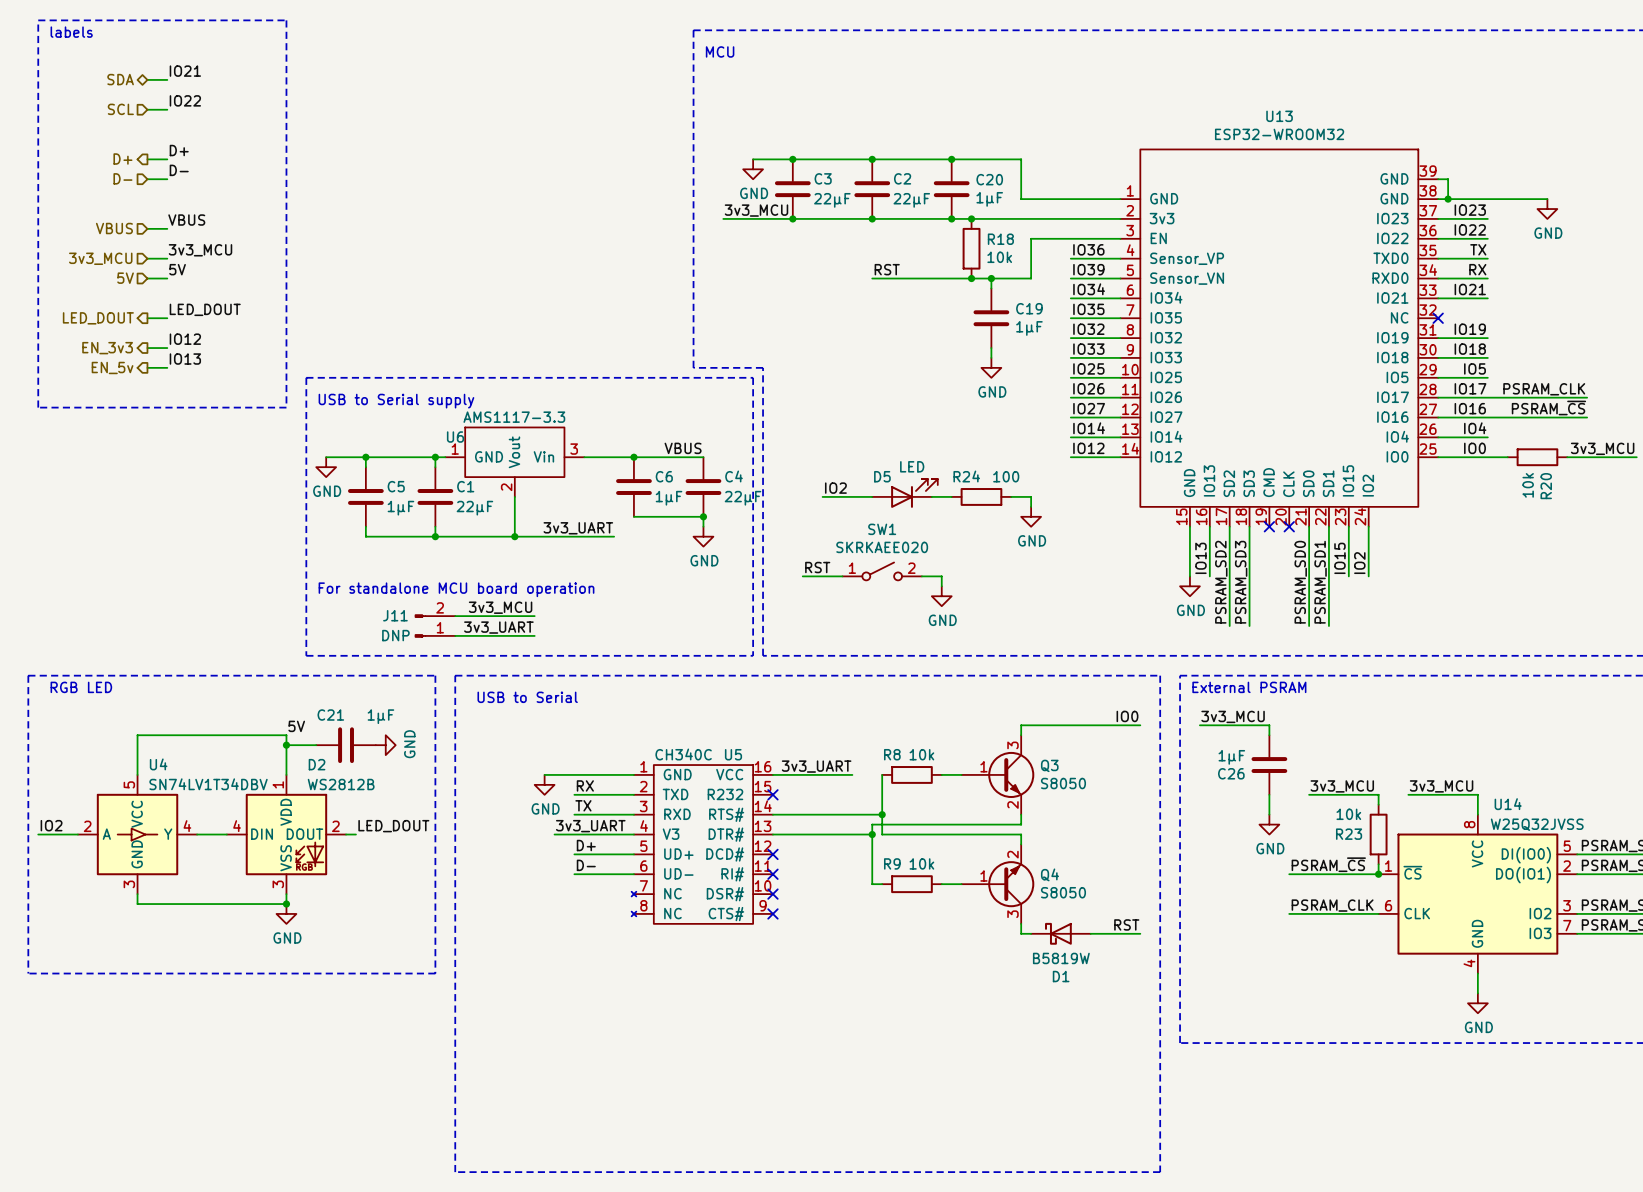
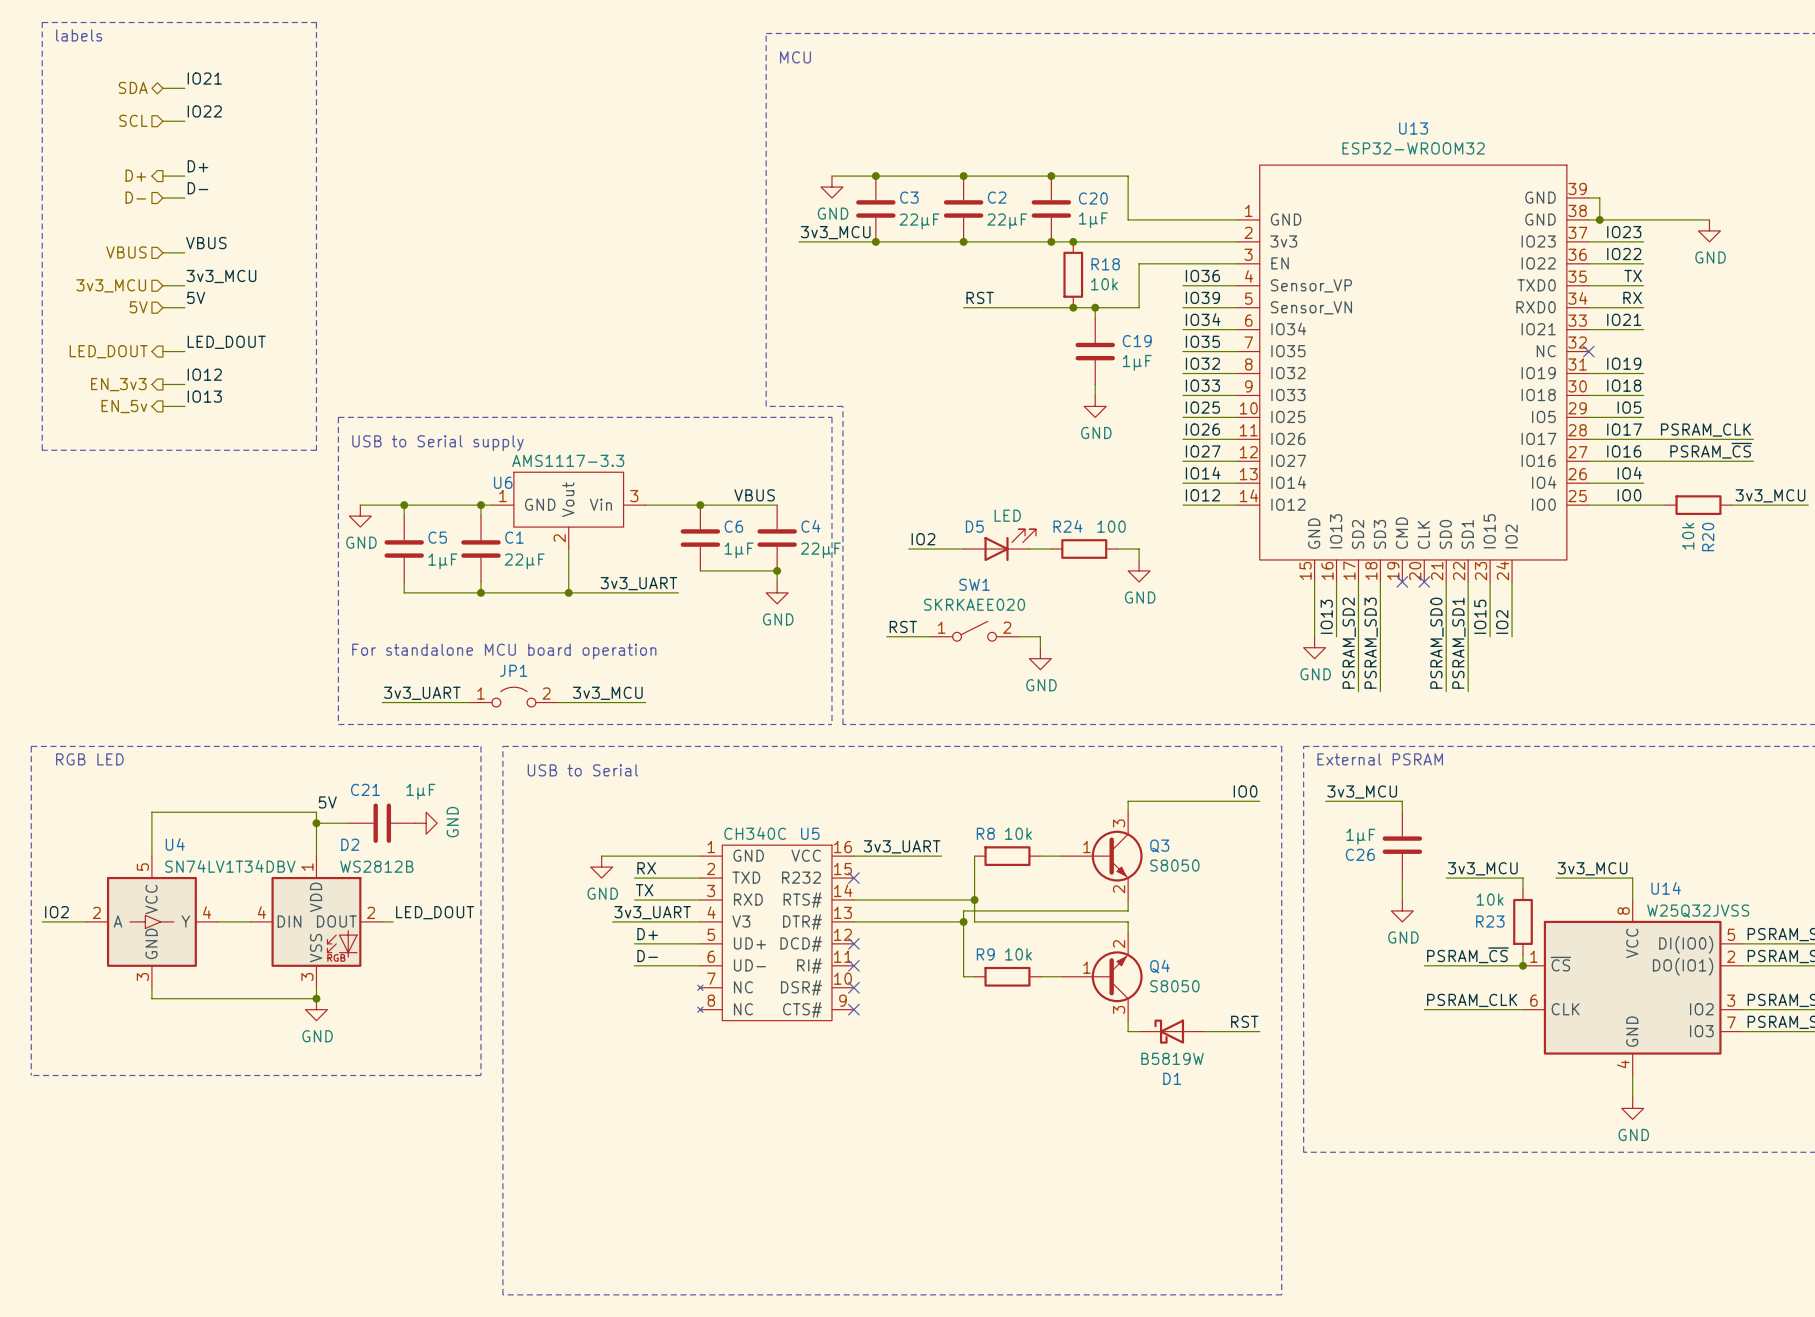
label position: 3v3_MCU (500, 607) -> 3v3_MCU (607, 693)
wire: (455, 616) (534, 616) -> (382, 702) (470, 702)
J11: DNP (435, 626) -> none
label position: 3v3_UART (498, 627) -> 3v3_UART (422, 693)
JP1: none -> (513, 697)
wire: (455, 635) (504, 635) -> (590, 702) (645, 702)

